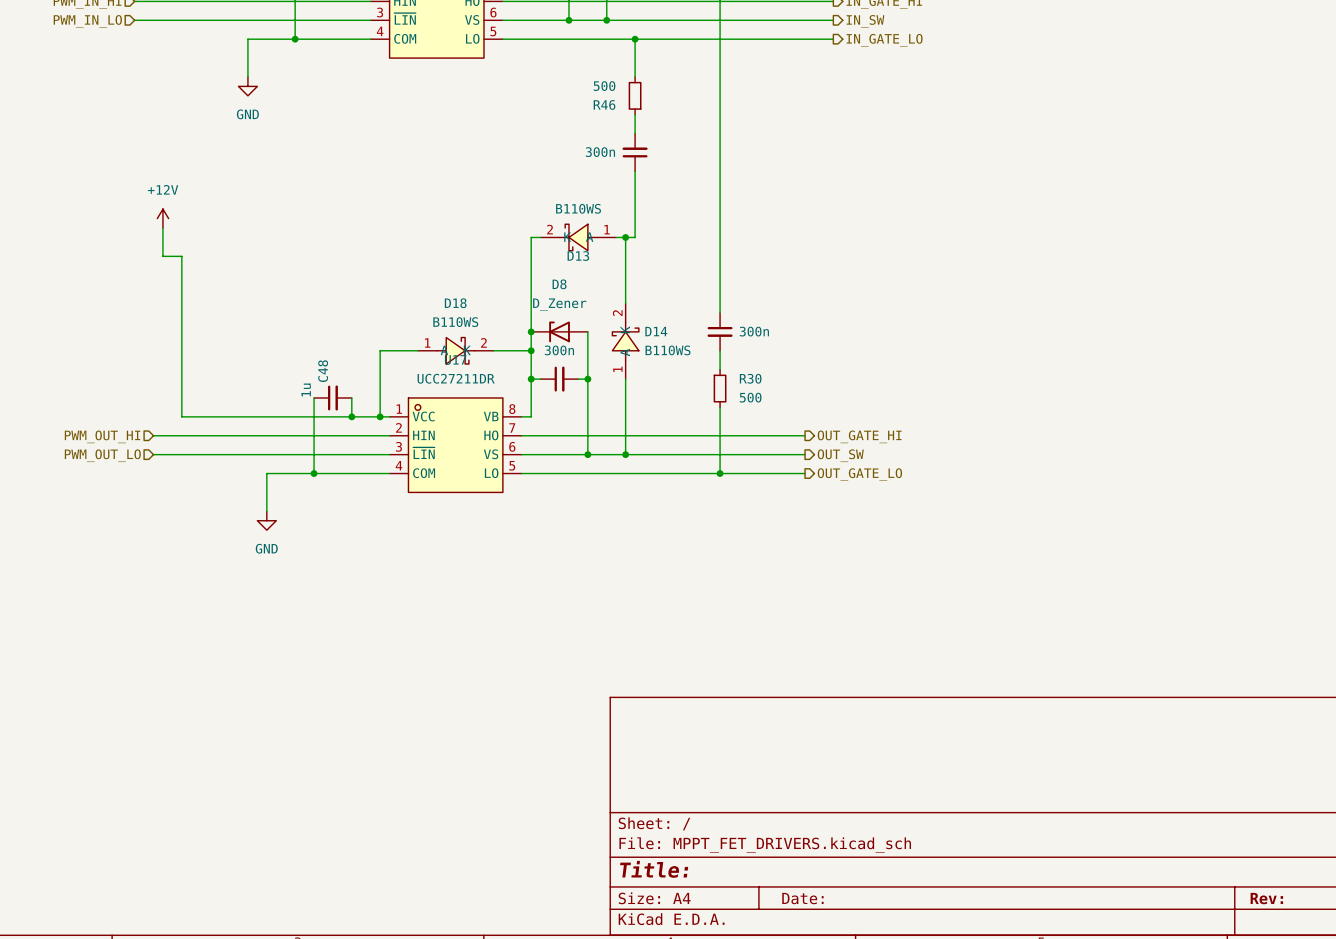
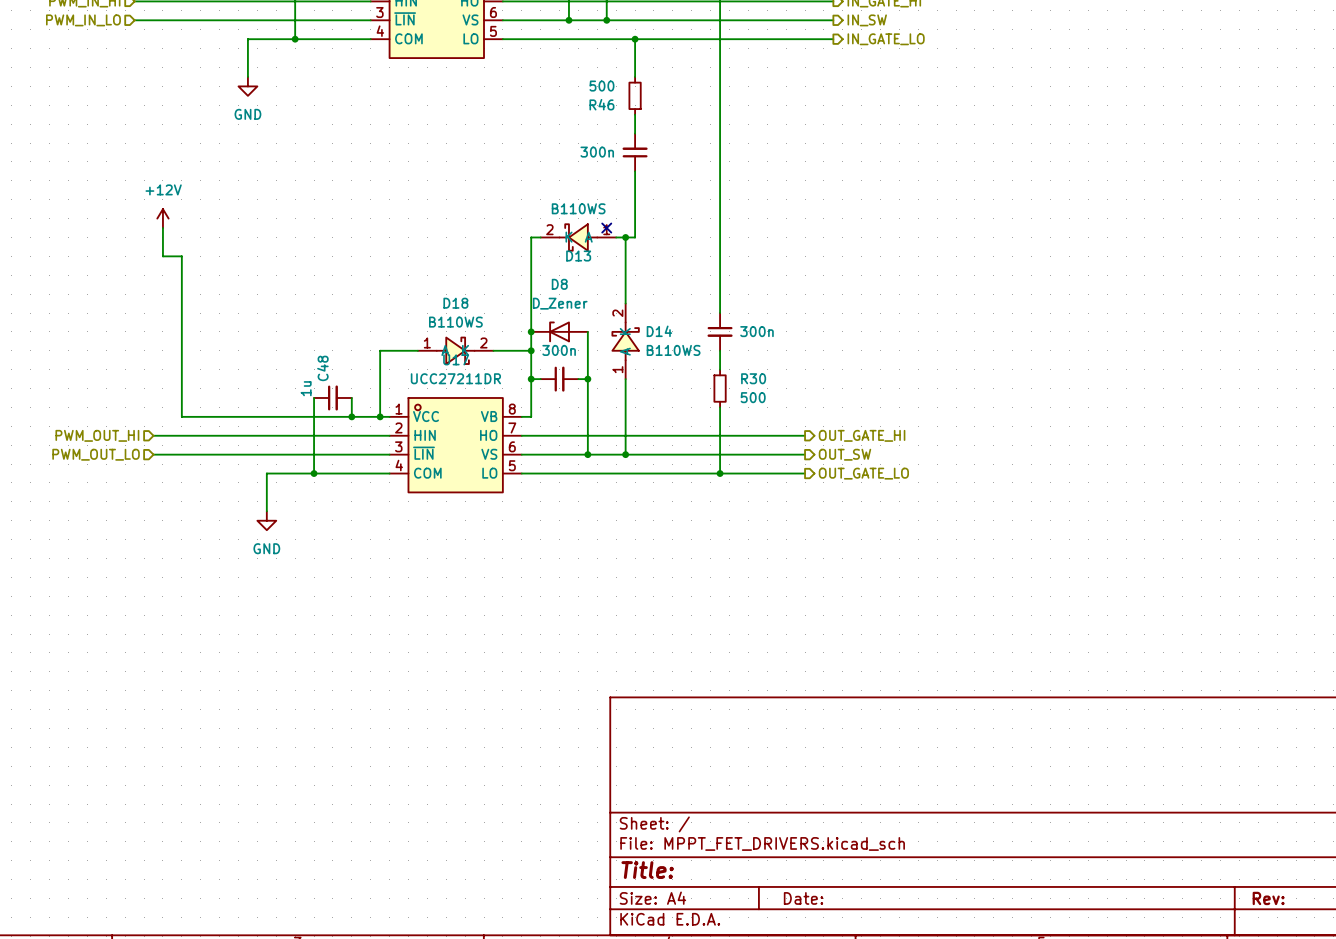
no-connect mark: none -> (606, 228)

